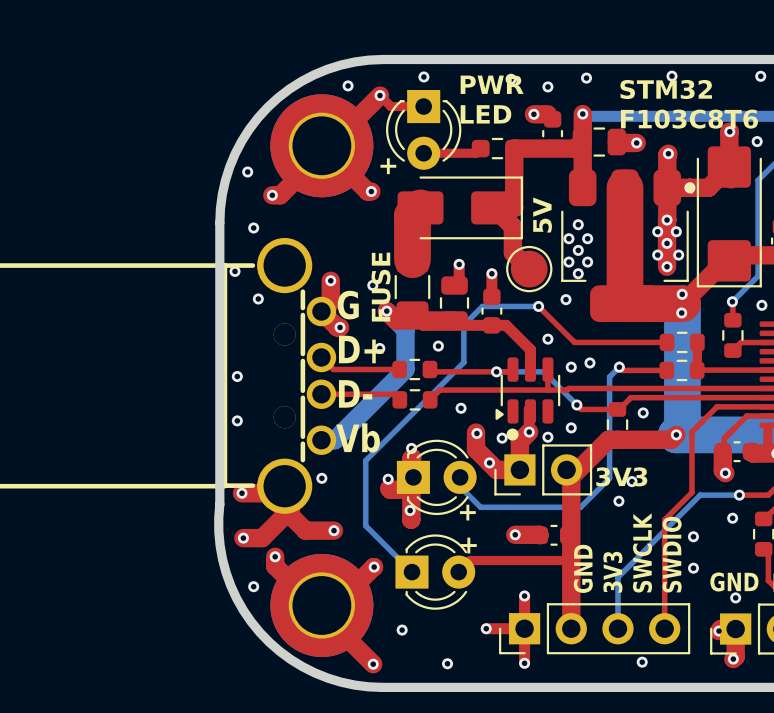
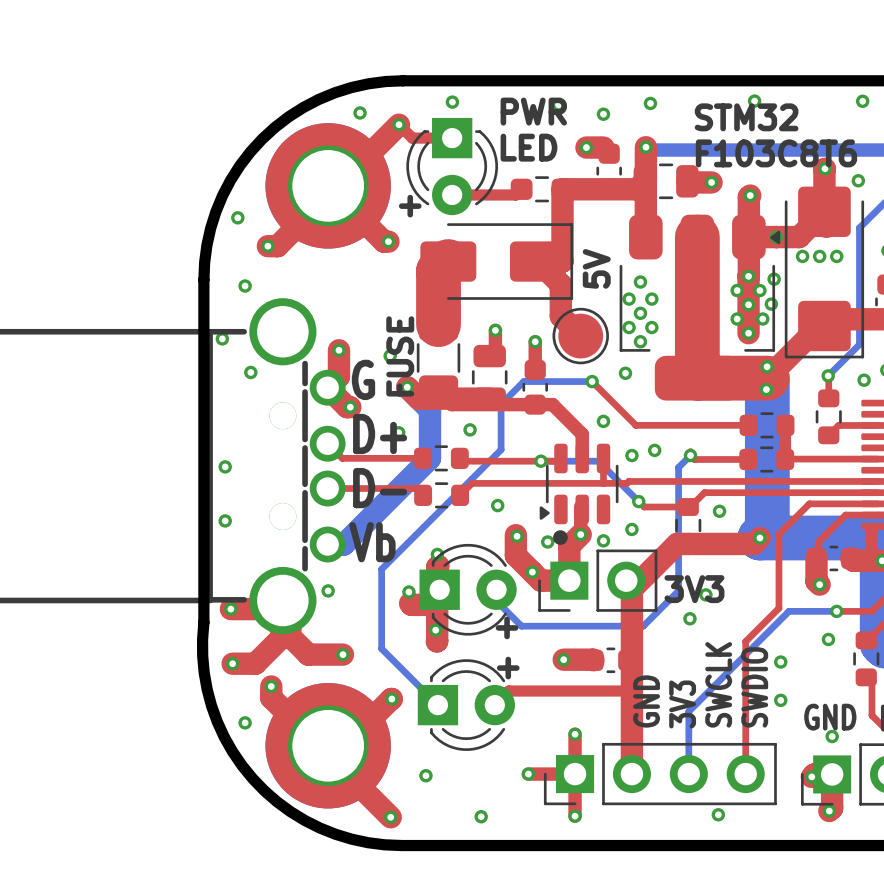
via: none -> (802, 256)
via: none -> (819, 256)
via: none -> (836, 256)
via: none -> (774, 279)
via: none -> (771, 304)

